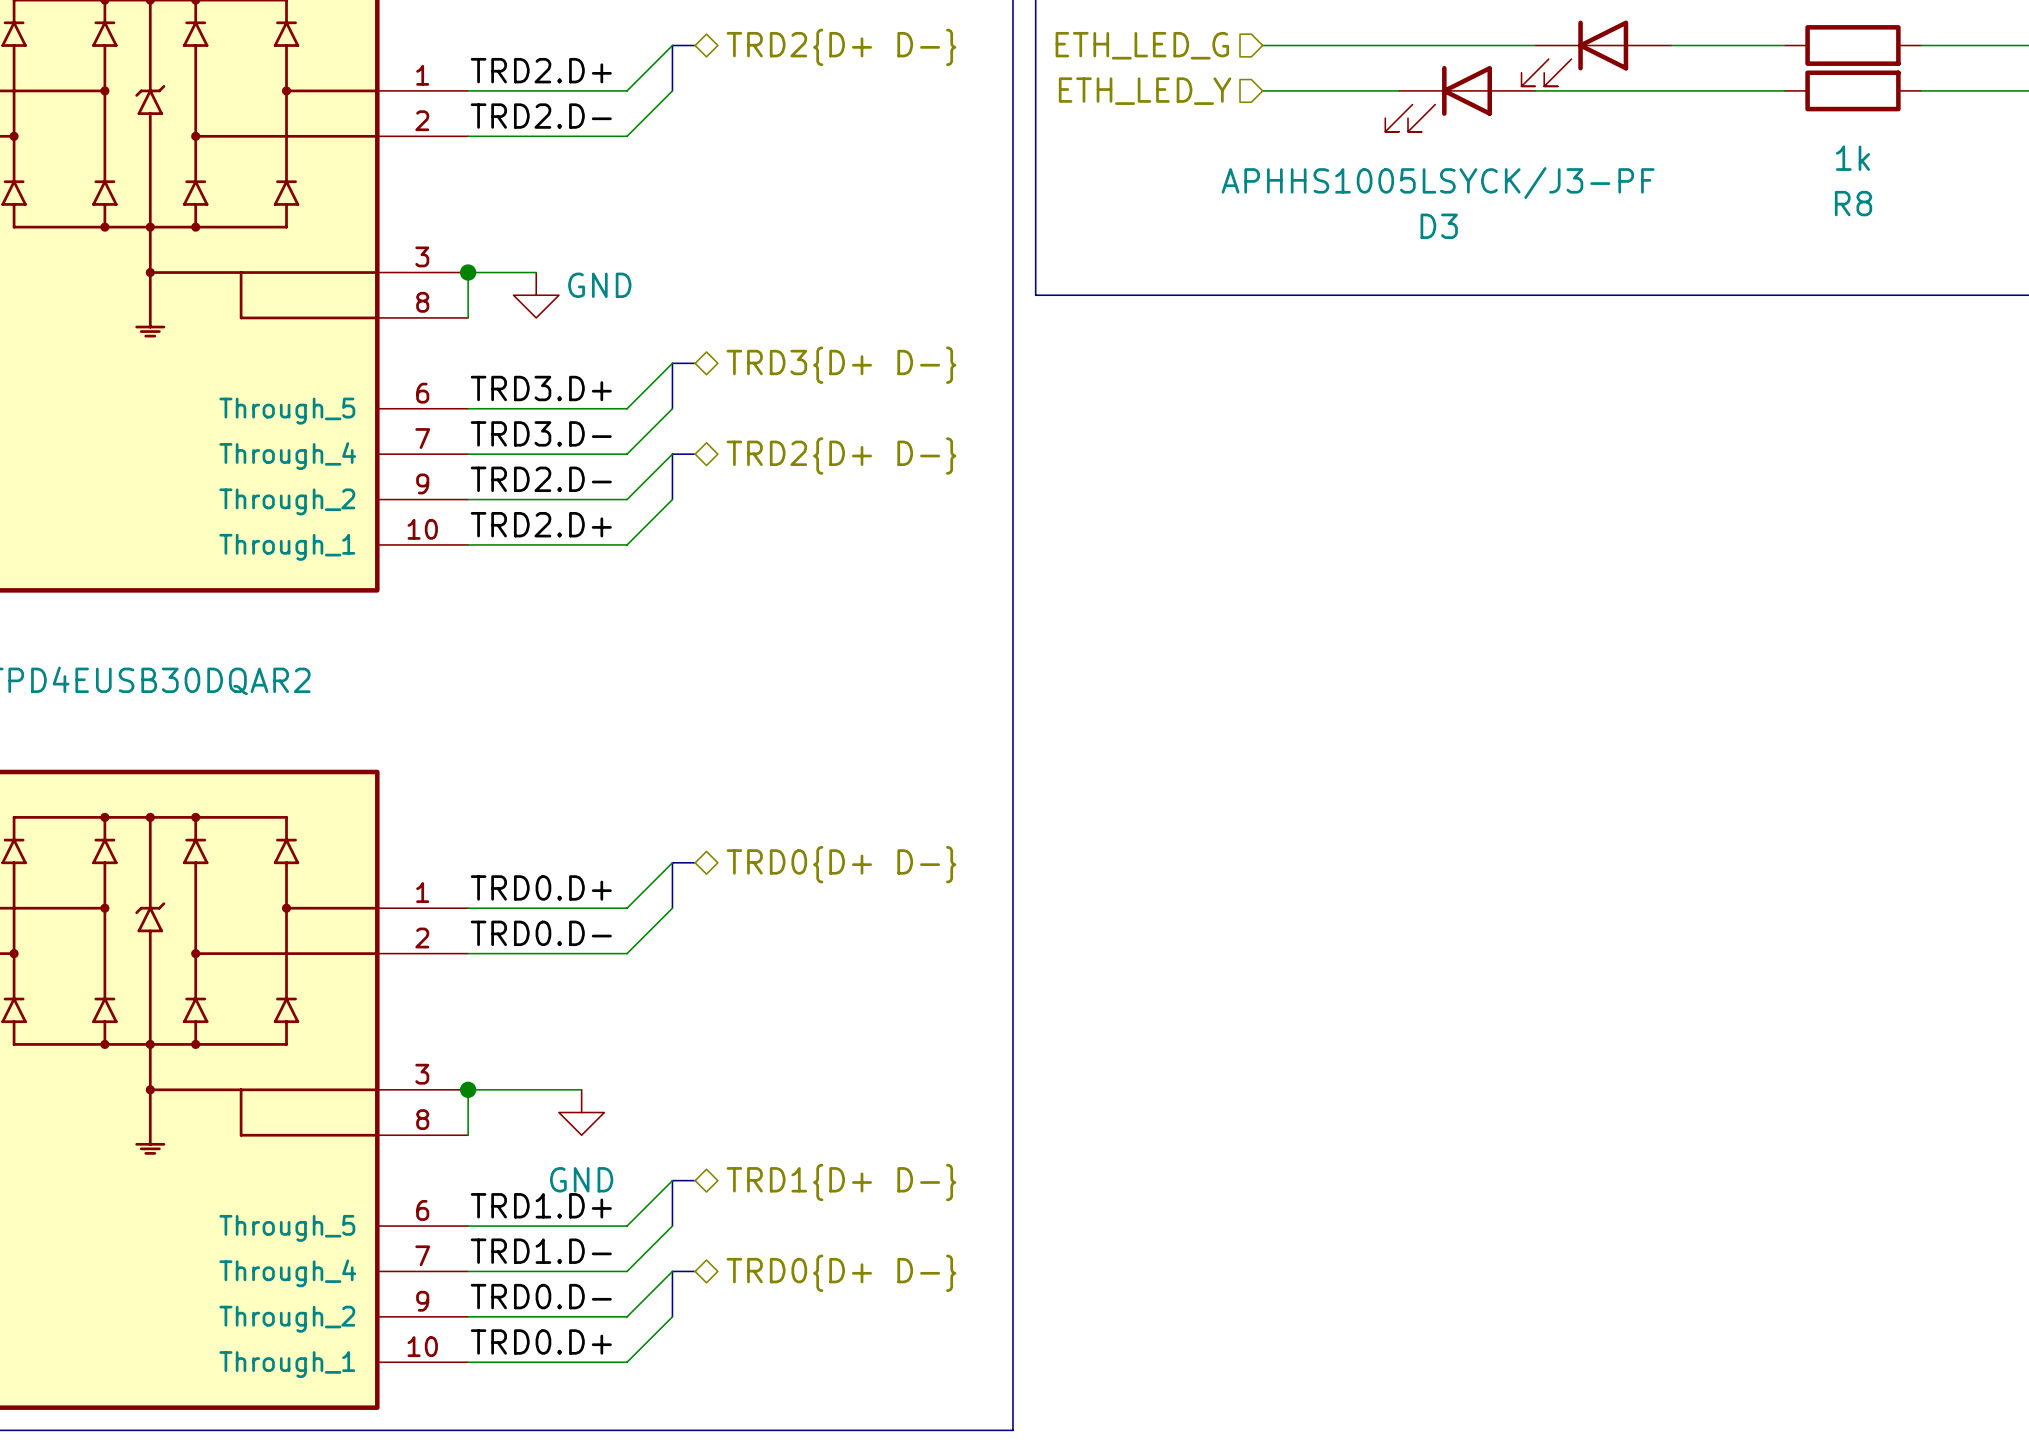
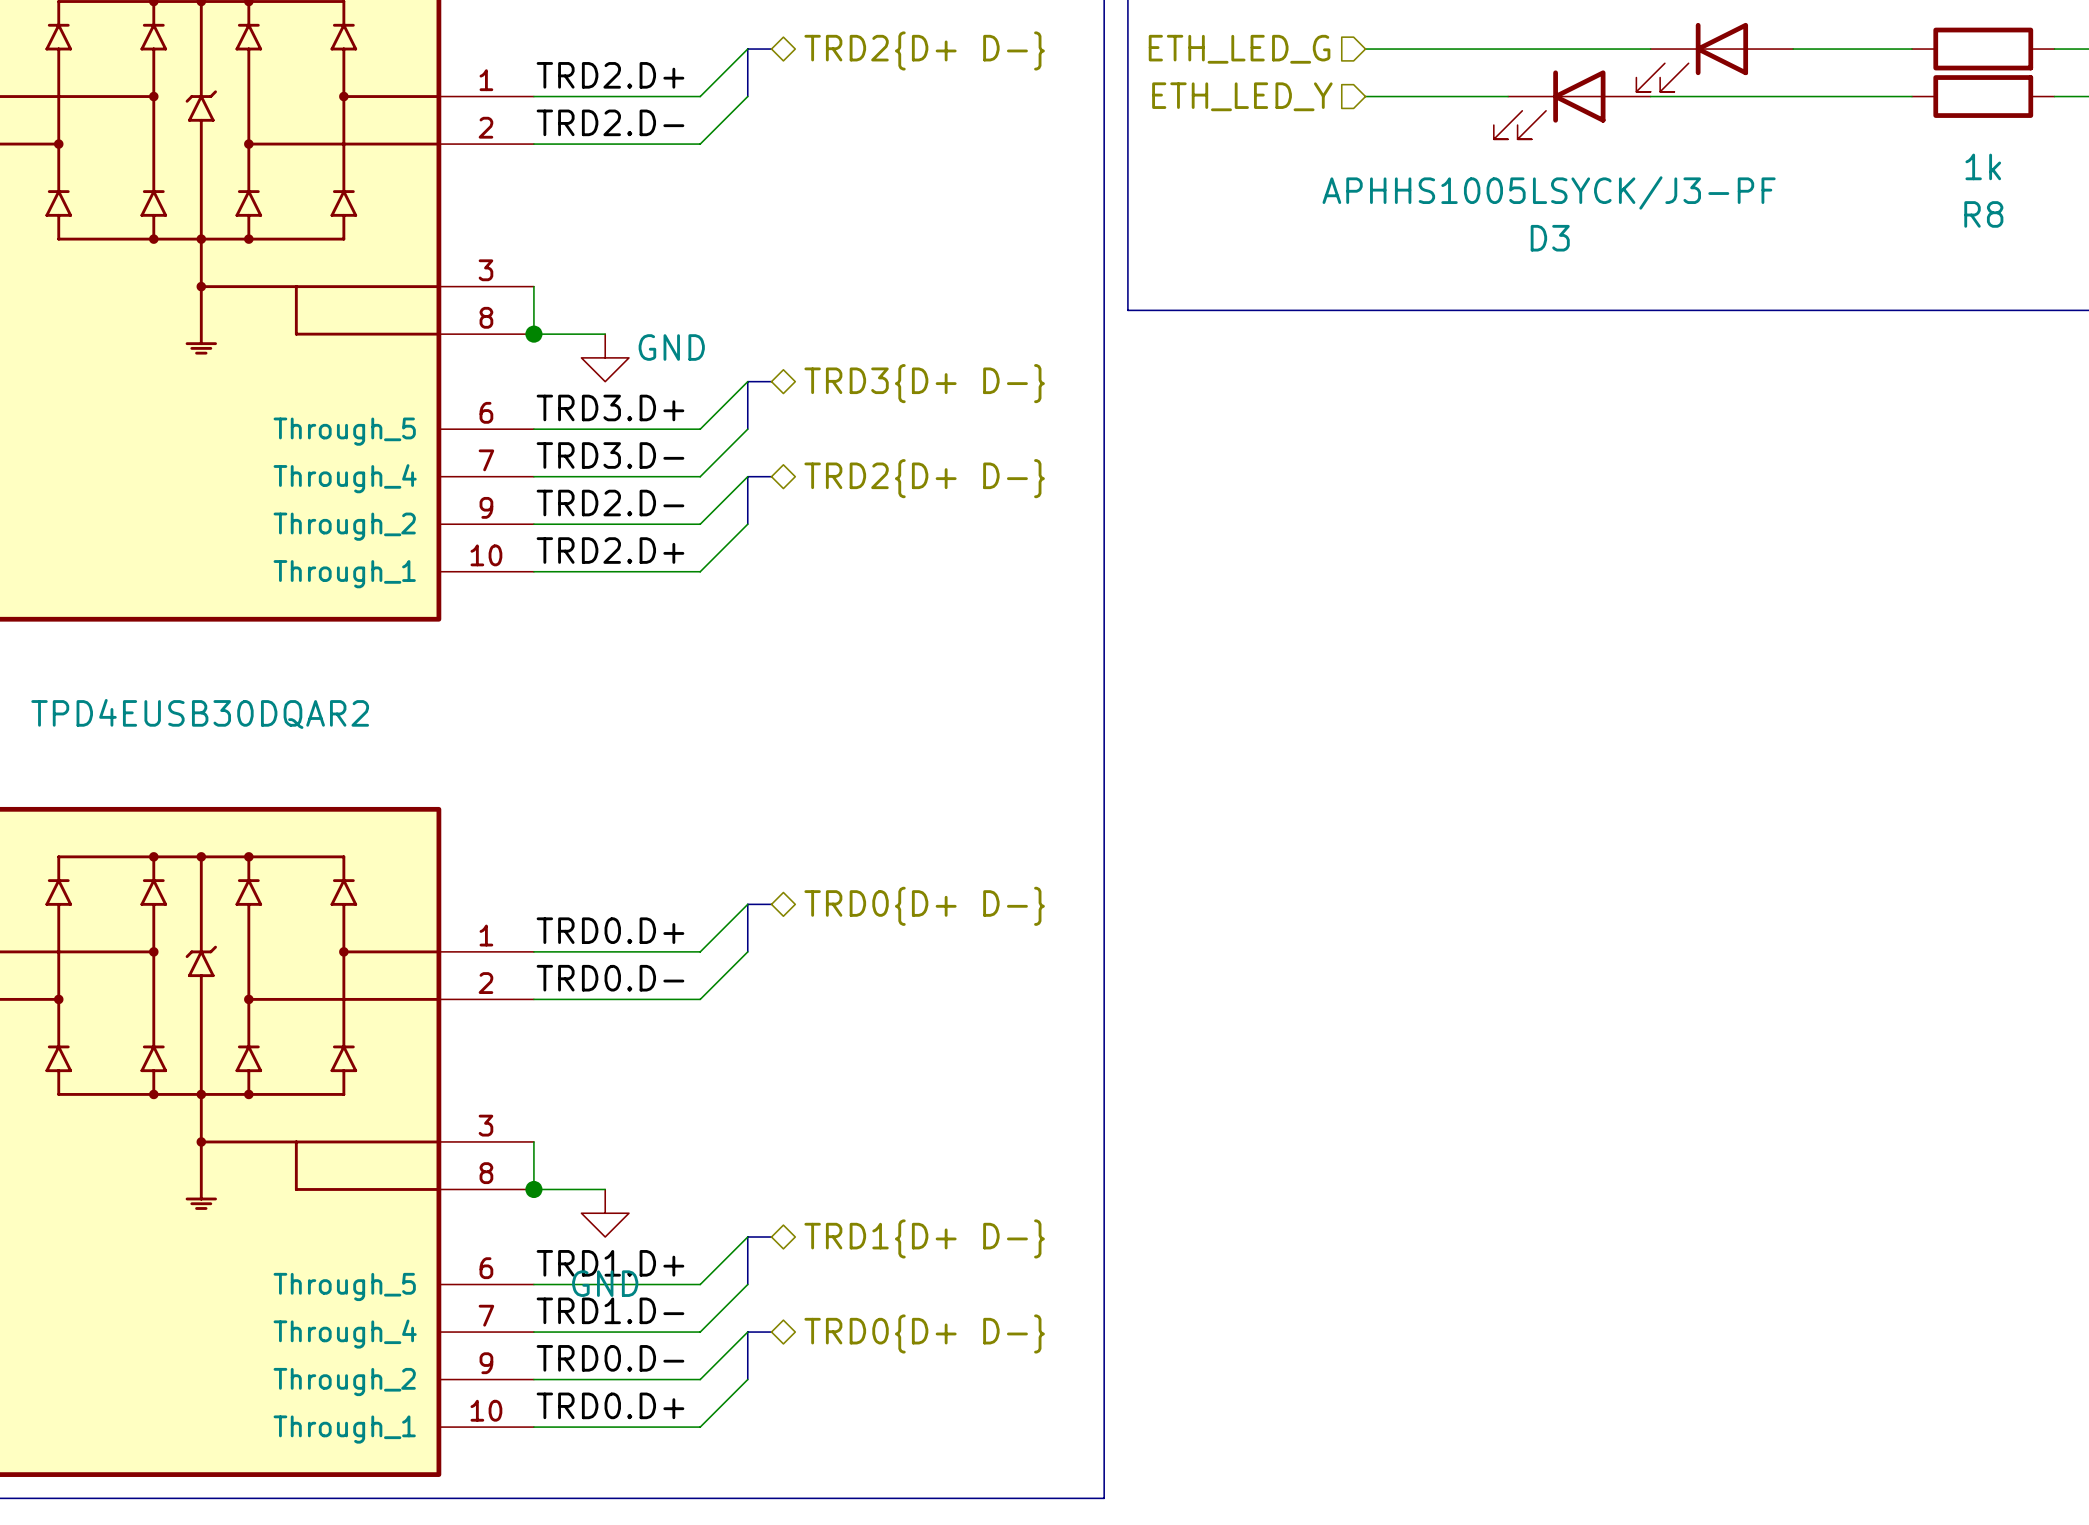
wire: (468, 272) (536, 272) -> (533, 334) (605, 334)
junction position: (468, 272) -> (533, 334)
power symbol position: GND (536, 295) -> GND (605, 357)
wire: (468, 1089) (581, 1089) -> none
junction position: (468, 1089) -> (533, 1189)
power symbol position: GND (581, 1112) -> GND (605, 1213)
wire: none -> (533, 1189) (605, 1189)

